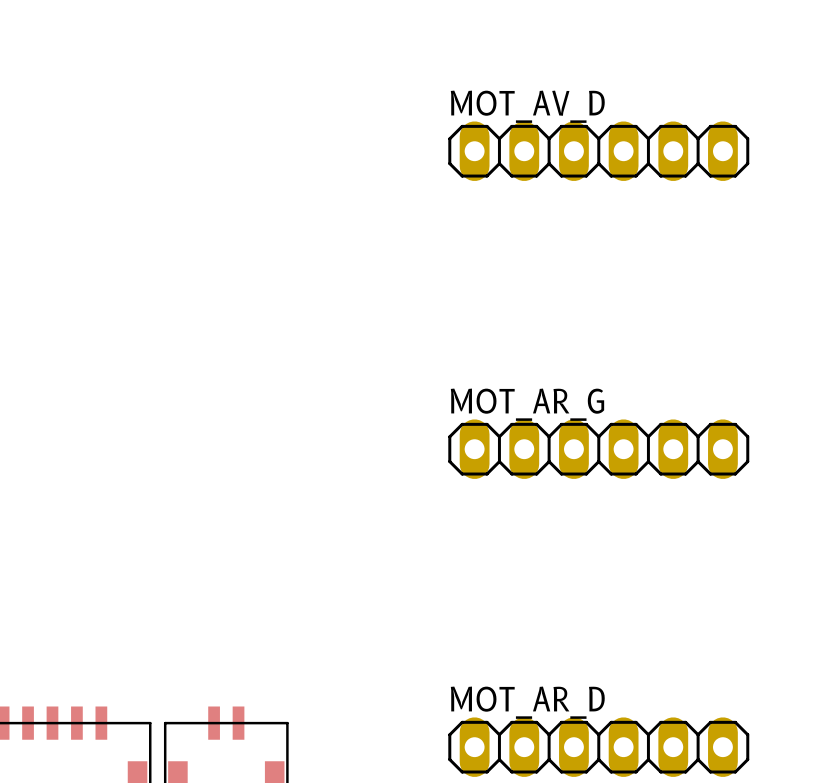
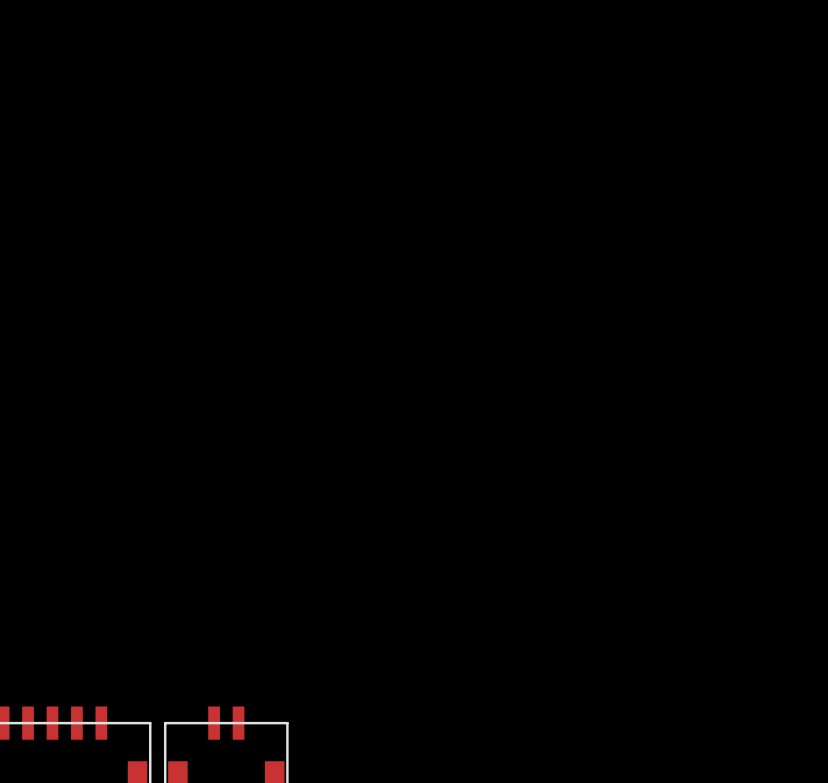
MOT_AV_D: (598, 151) -> none
MOT_AR_G: (598, 449) -> none
MOT_AR_D: (598, 747) -> none

